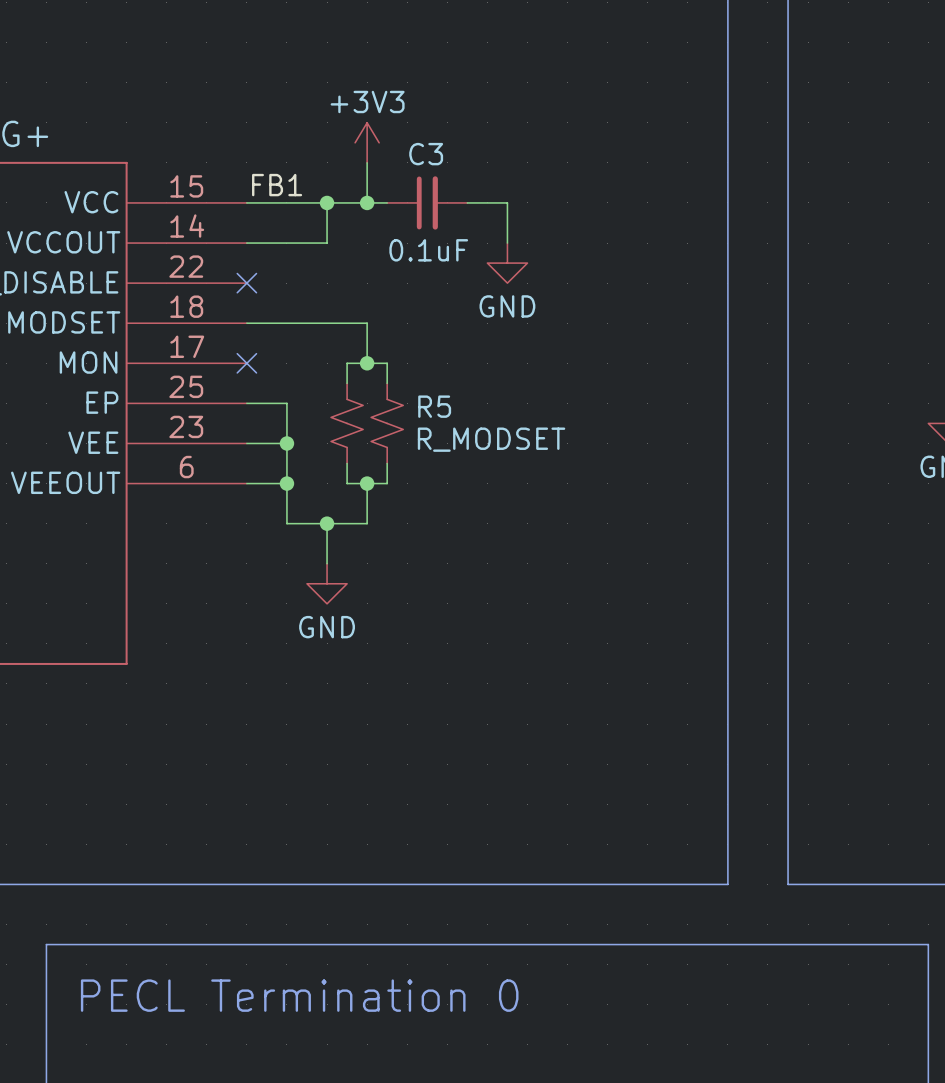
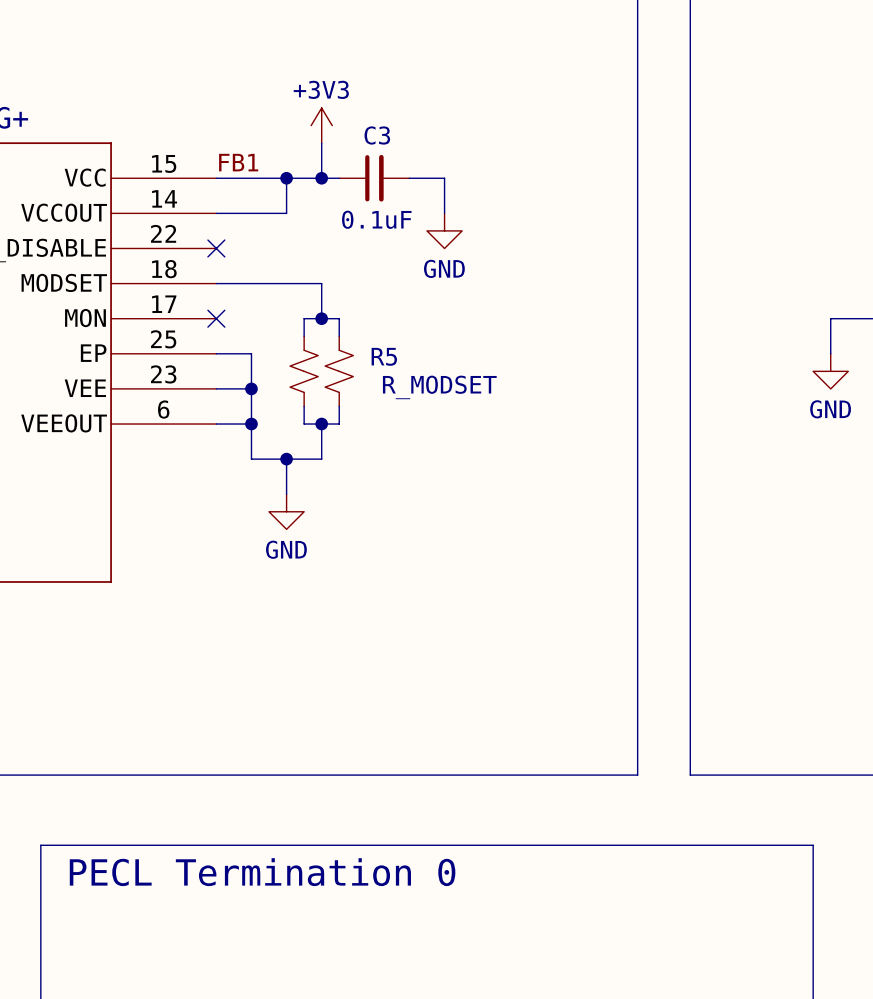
line: (46, 964) (46, 944) (928, 944) (928, 964) -> (40, 845) (813, 845)

